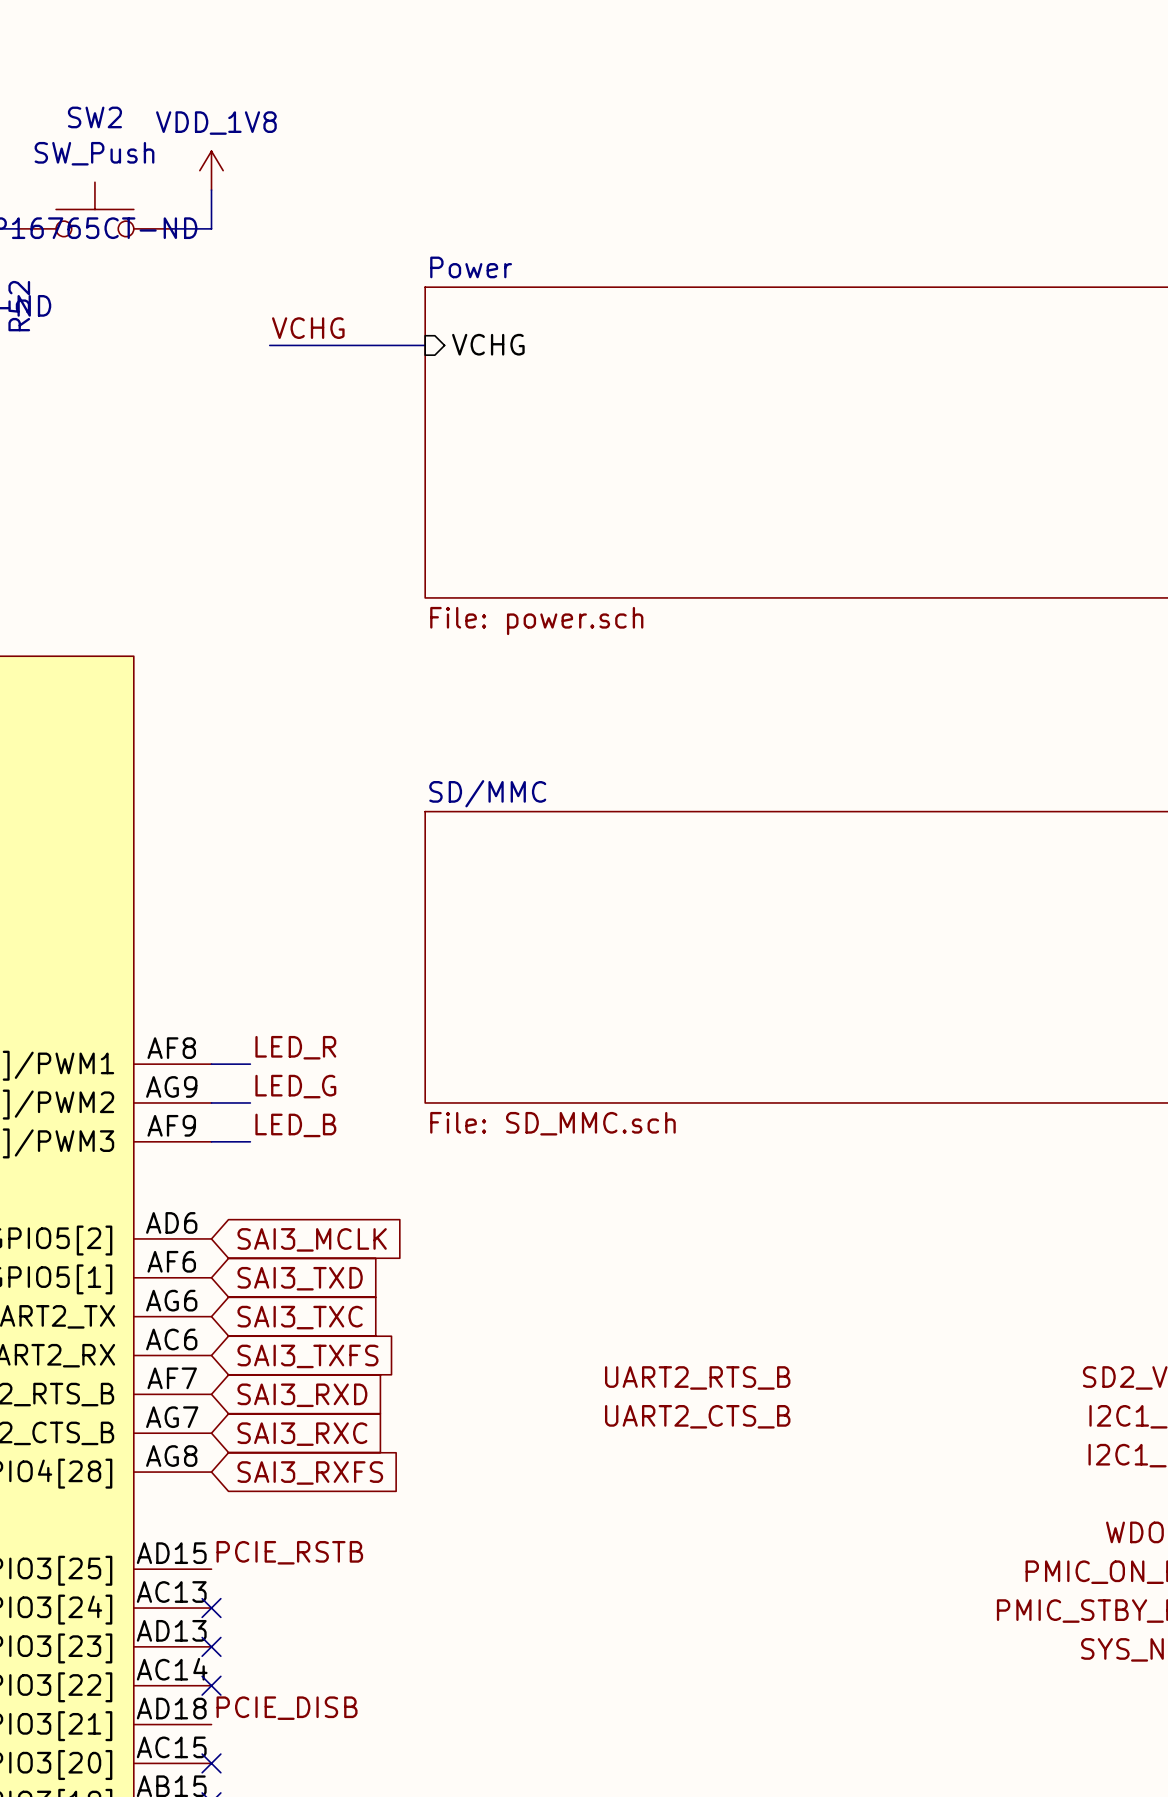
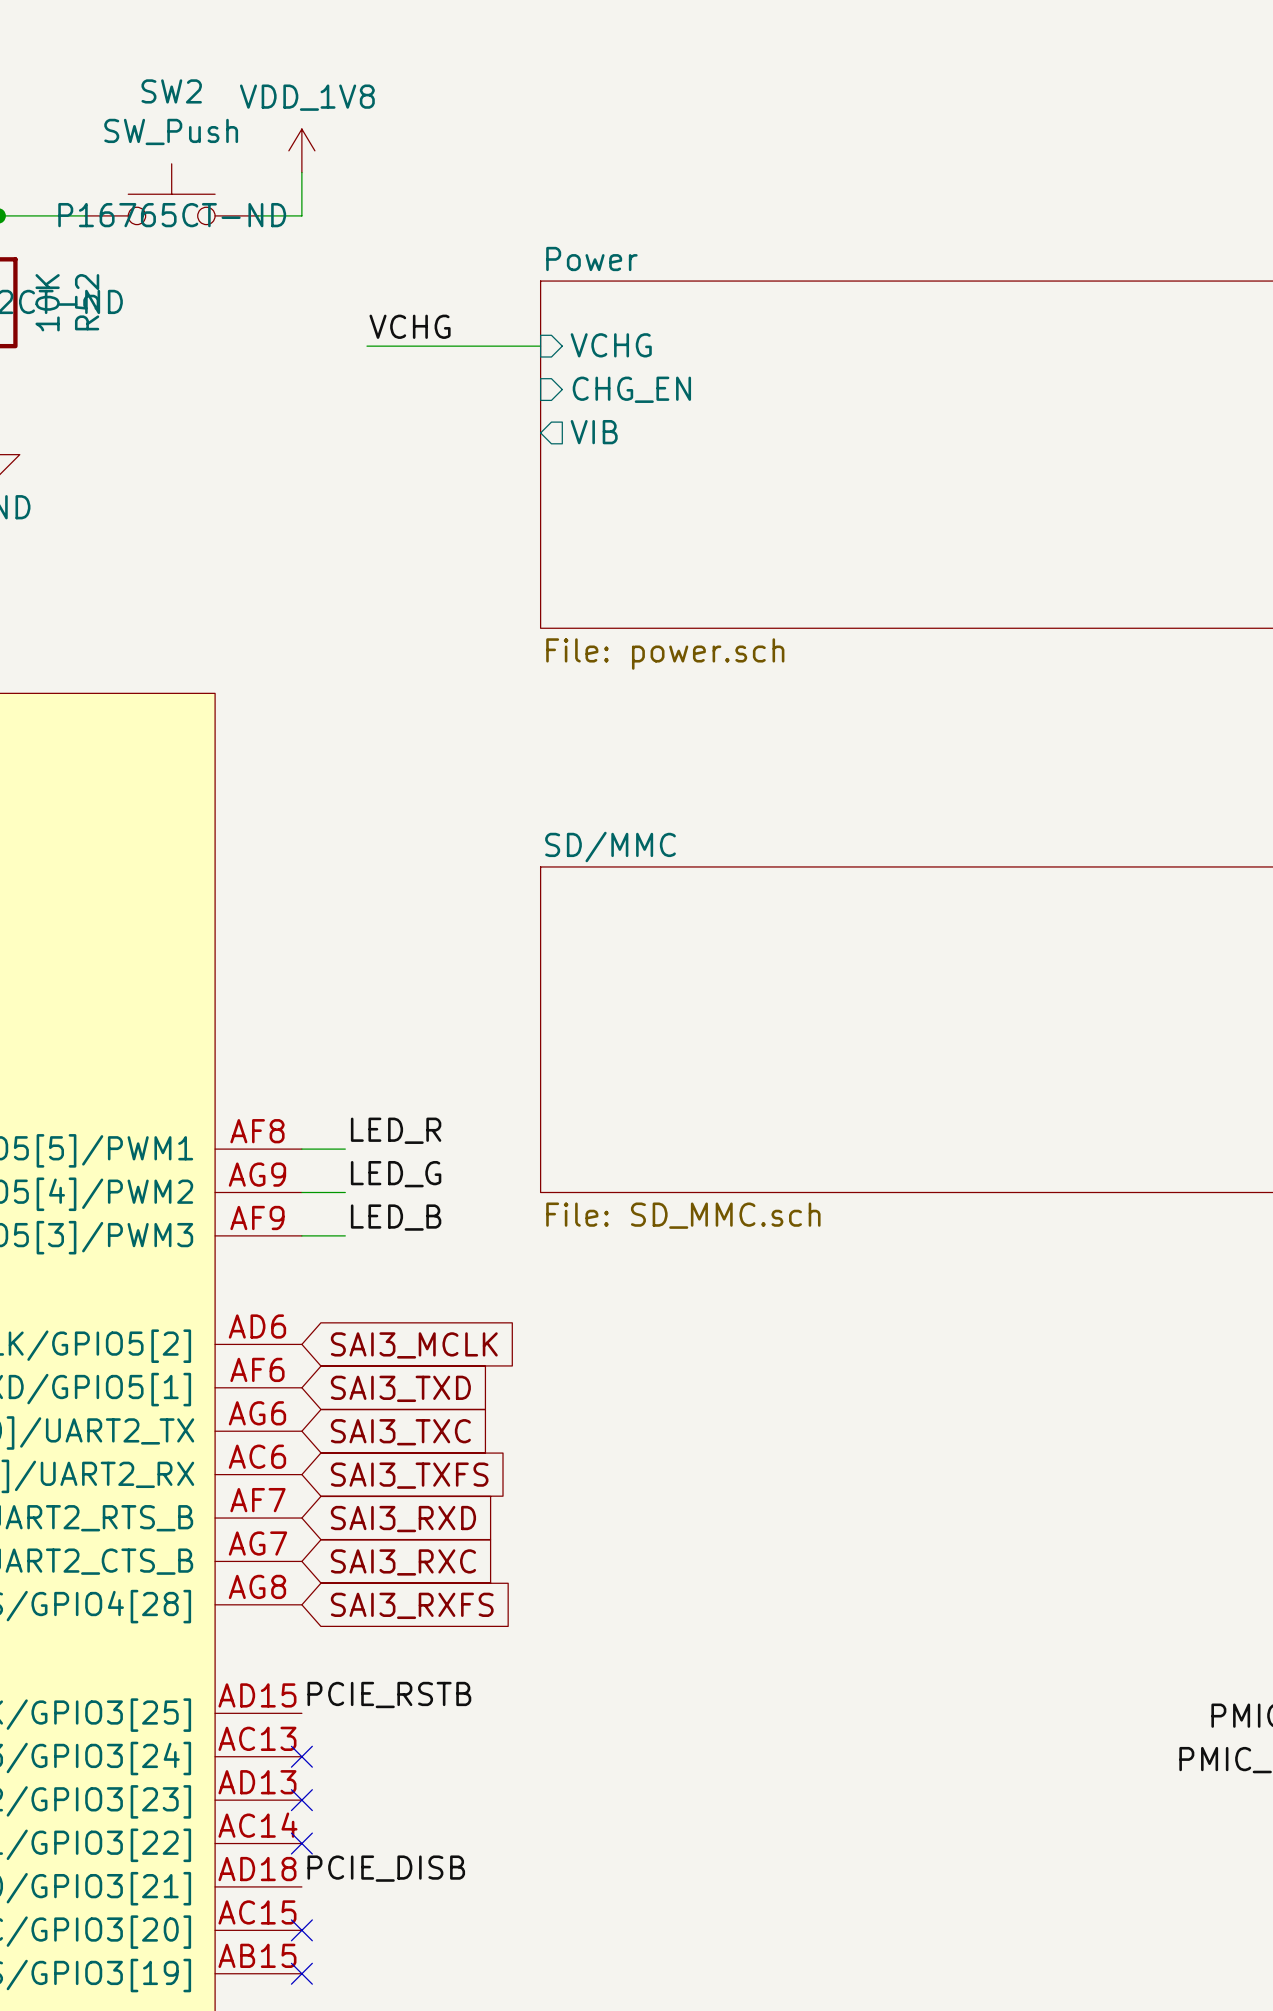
sheet pin: none -> CHG_EN (631, 389)
sheet pin: none -> VIB (594, 432)
label: UART2_RTS_B (697, 1377) -> none
label: UART2_CTS_B (697, 1416) -> none

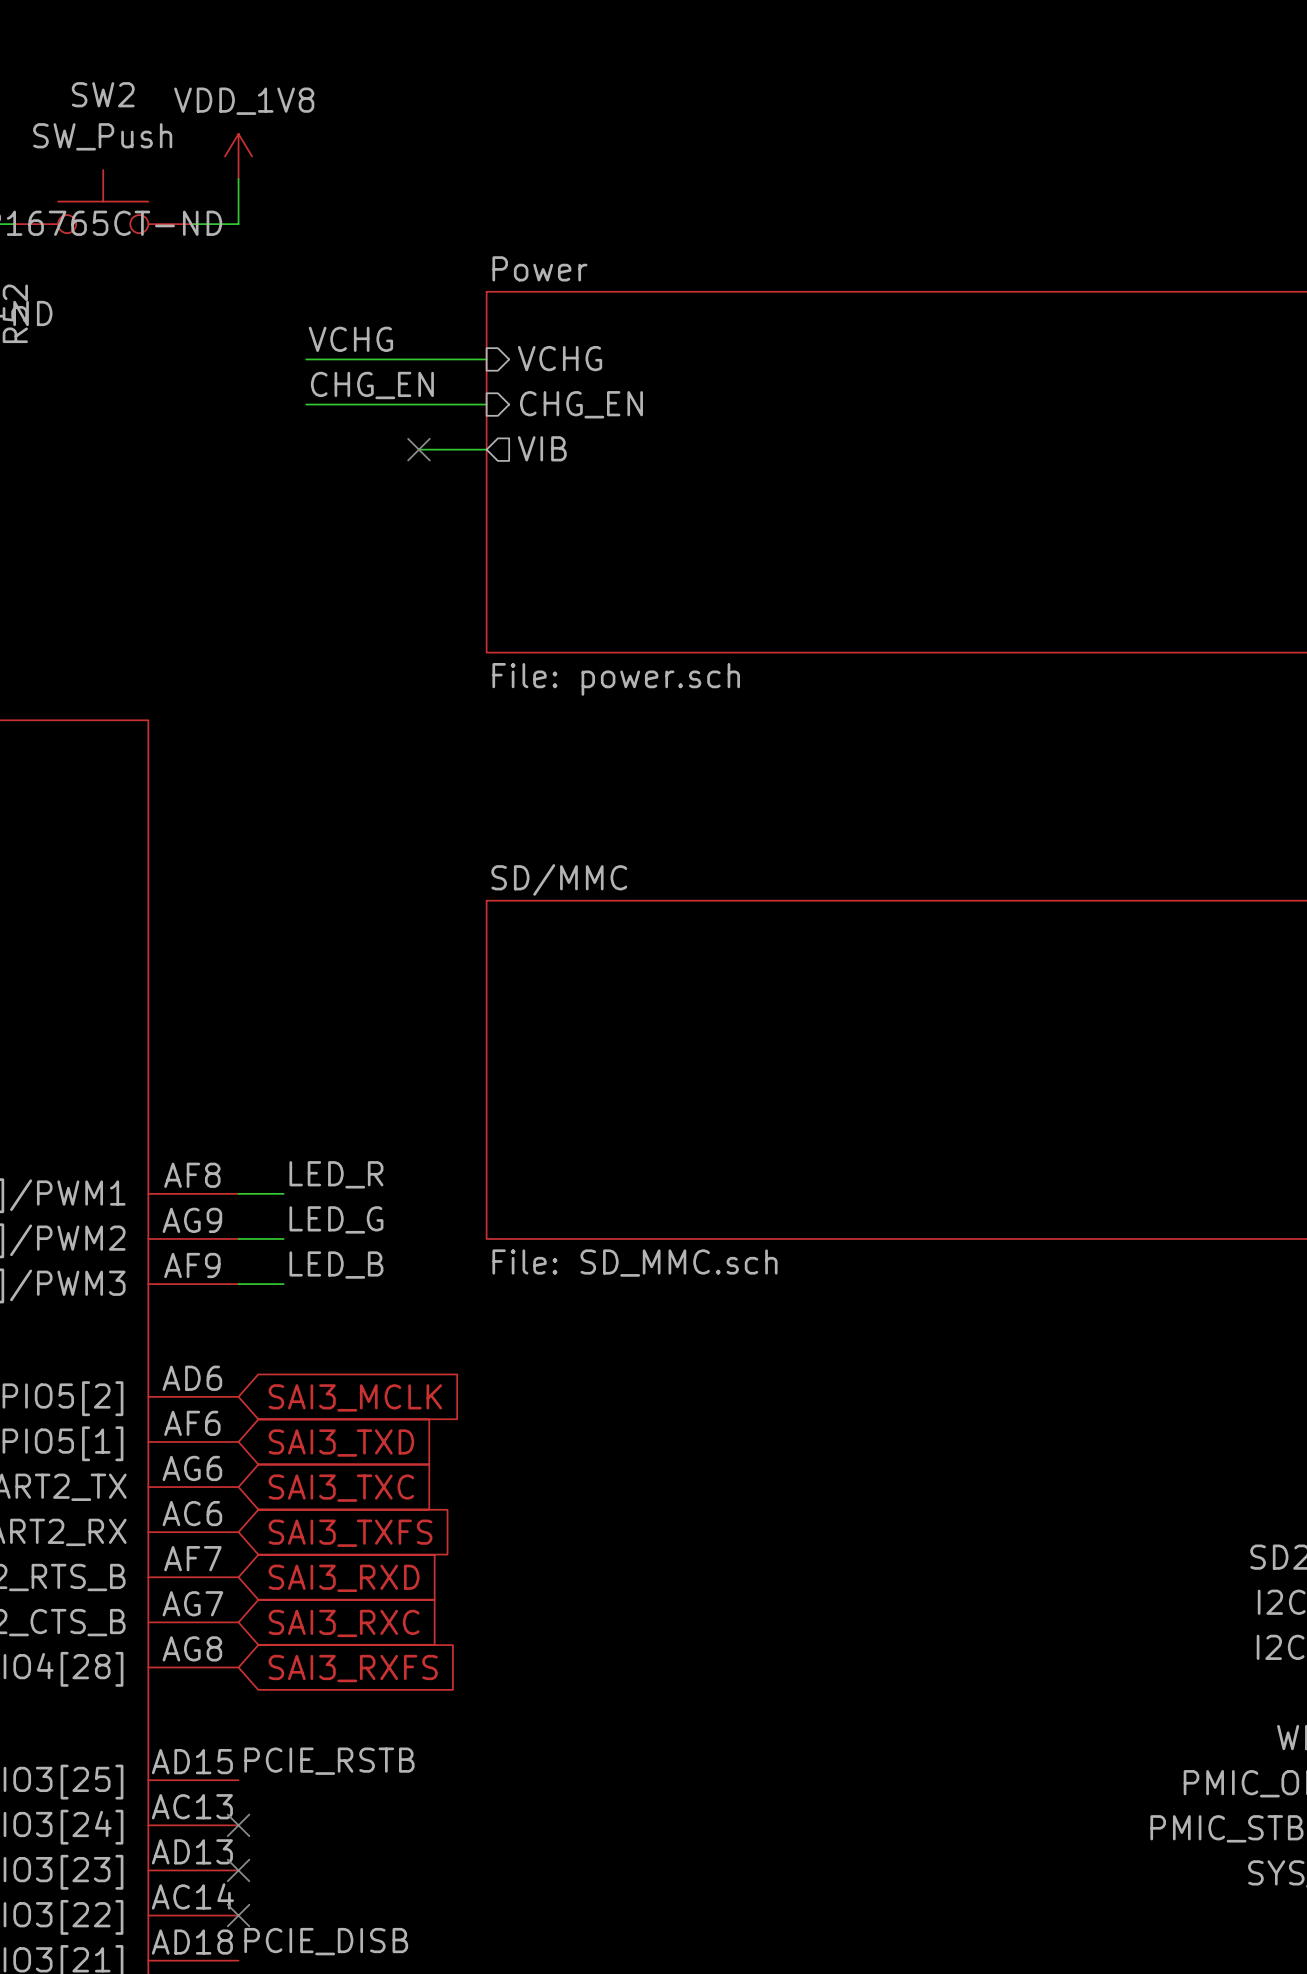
label: none -> CHG_EN (372, 385)
wire: none -> (306, 404) (486, 404)
wire: none -> (418, 449) (486, 449)
no-connect mark: none -> (418, 449)

